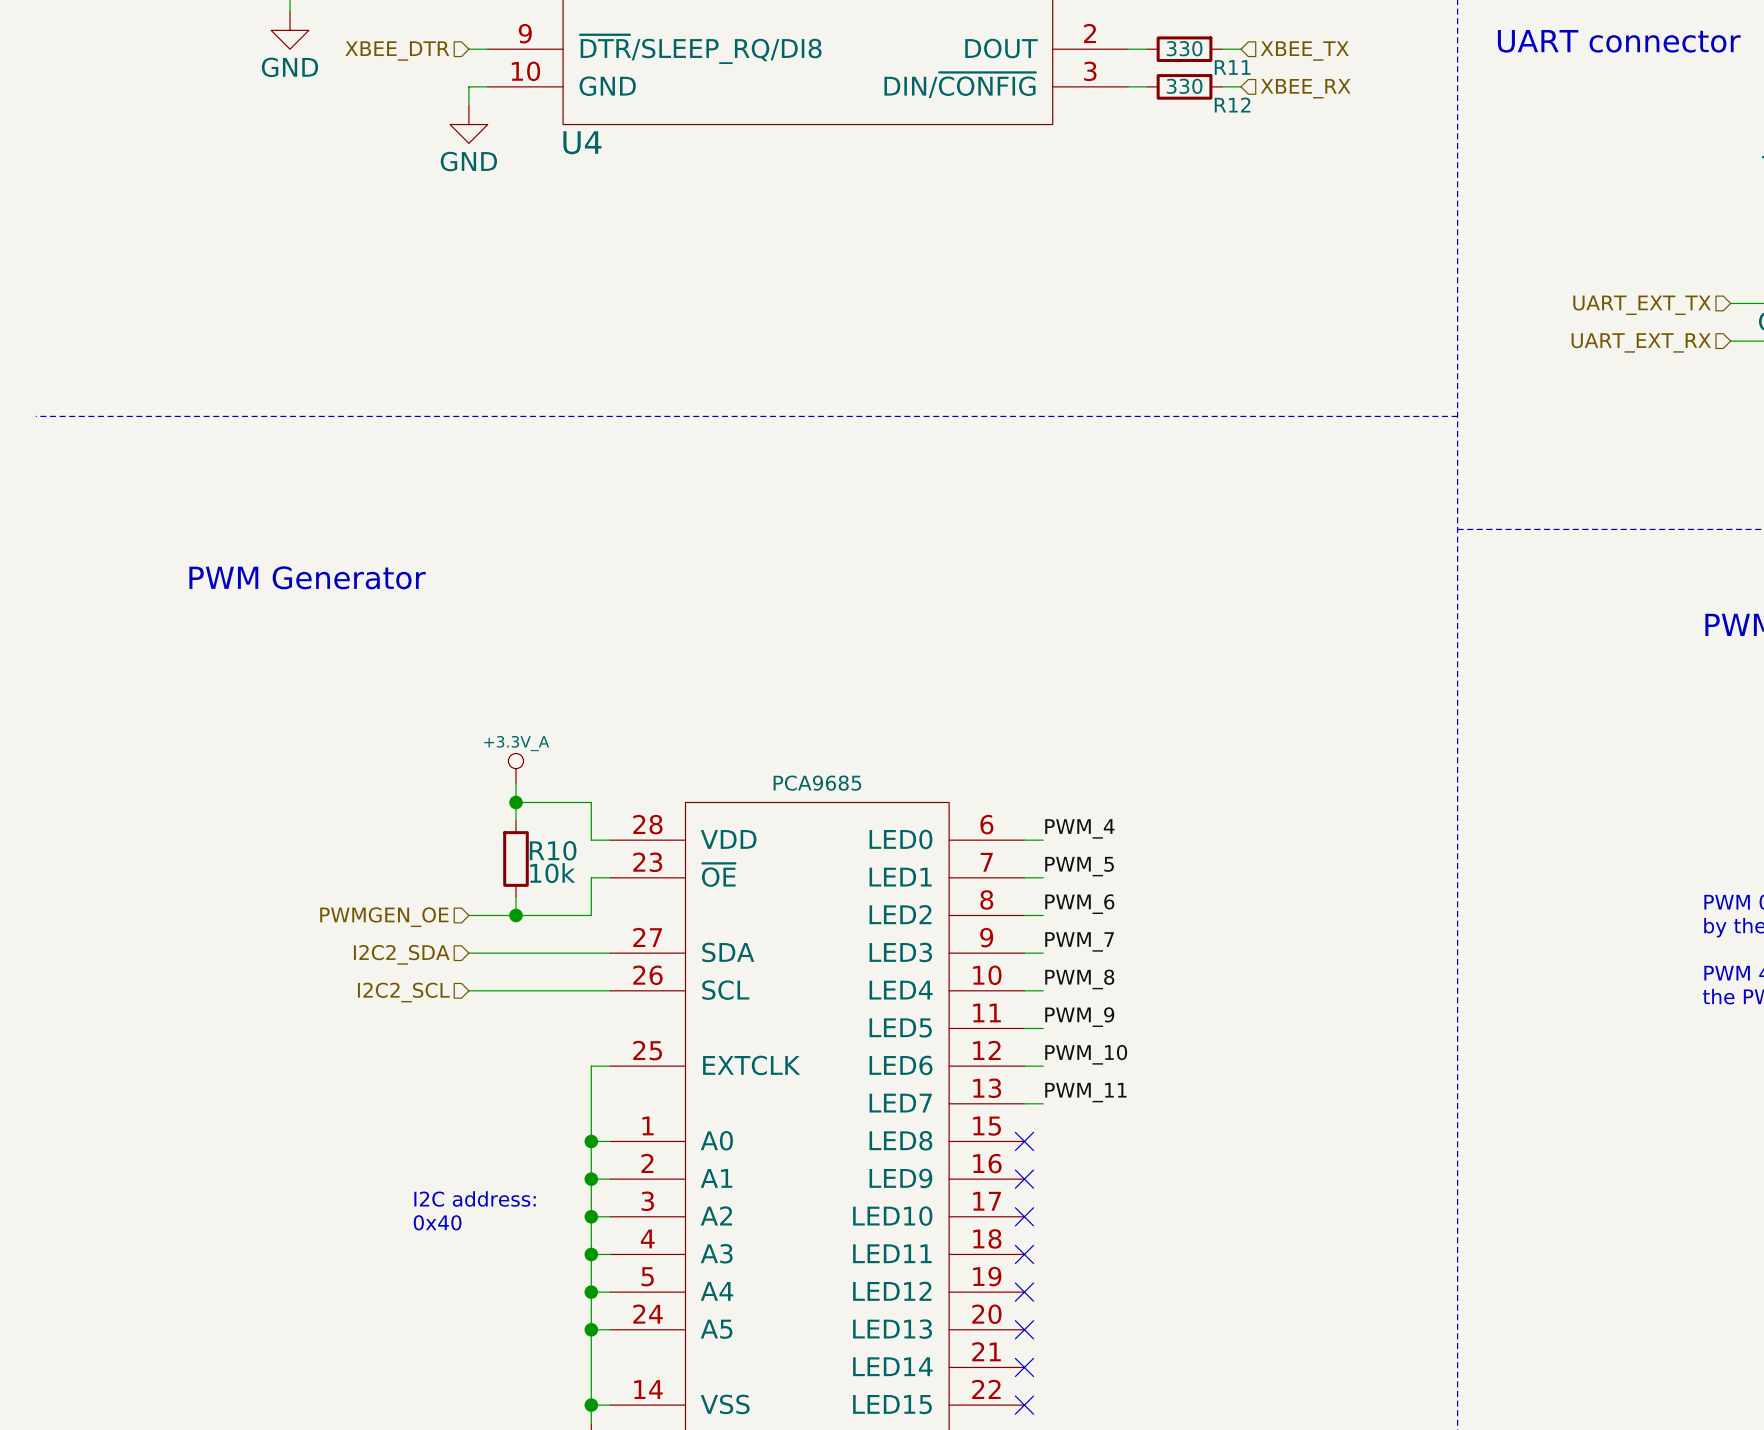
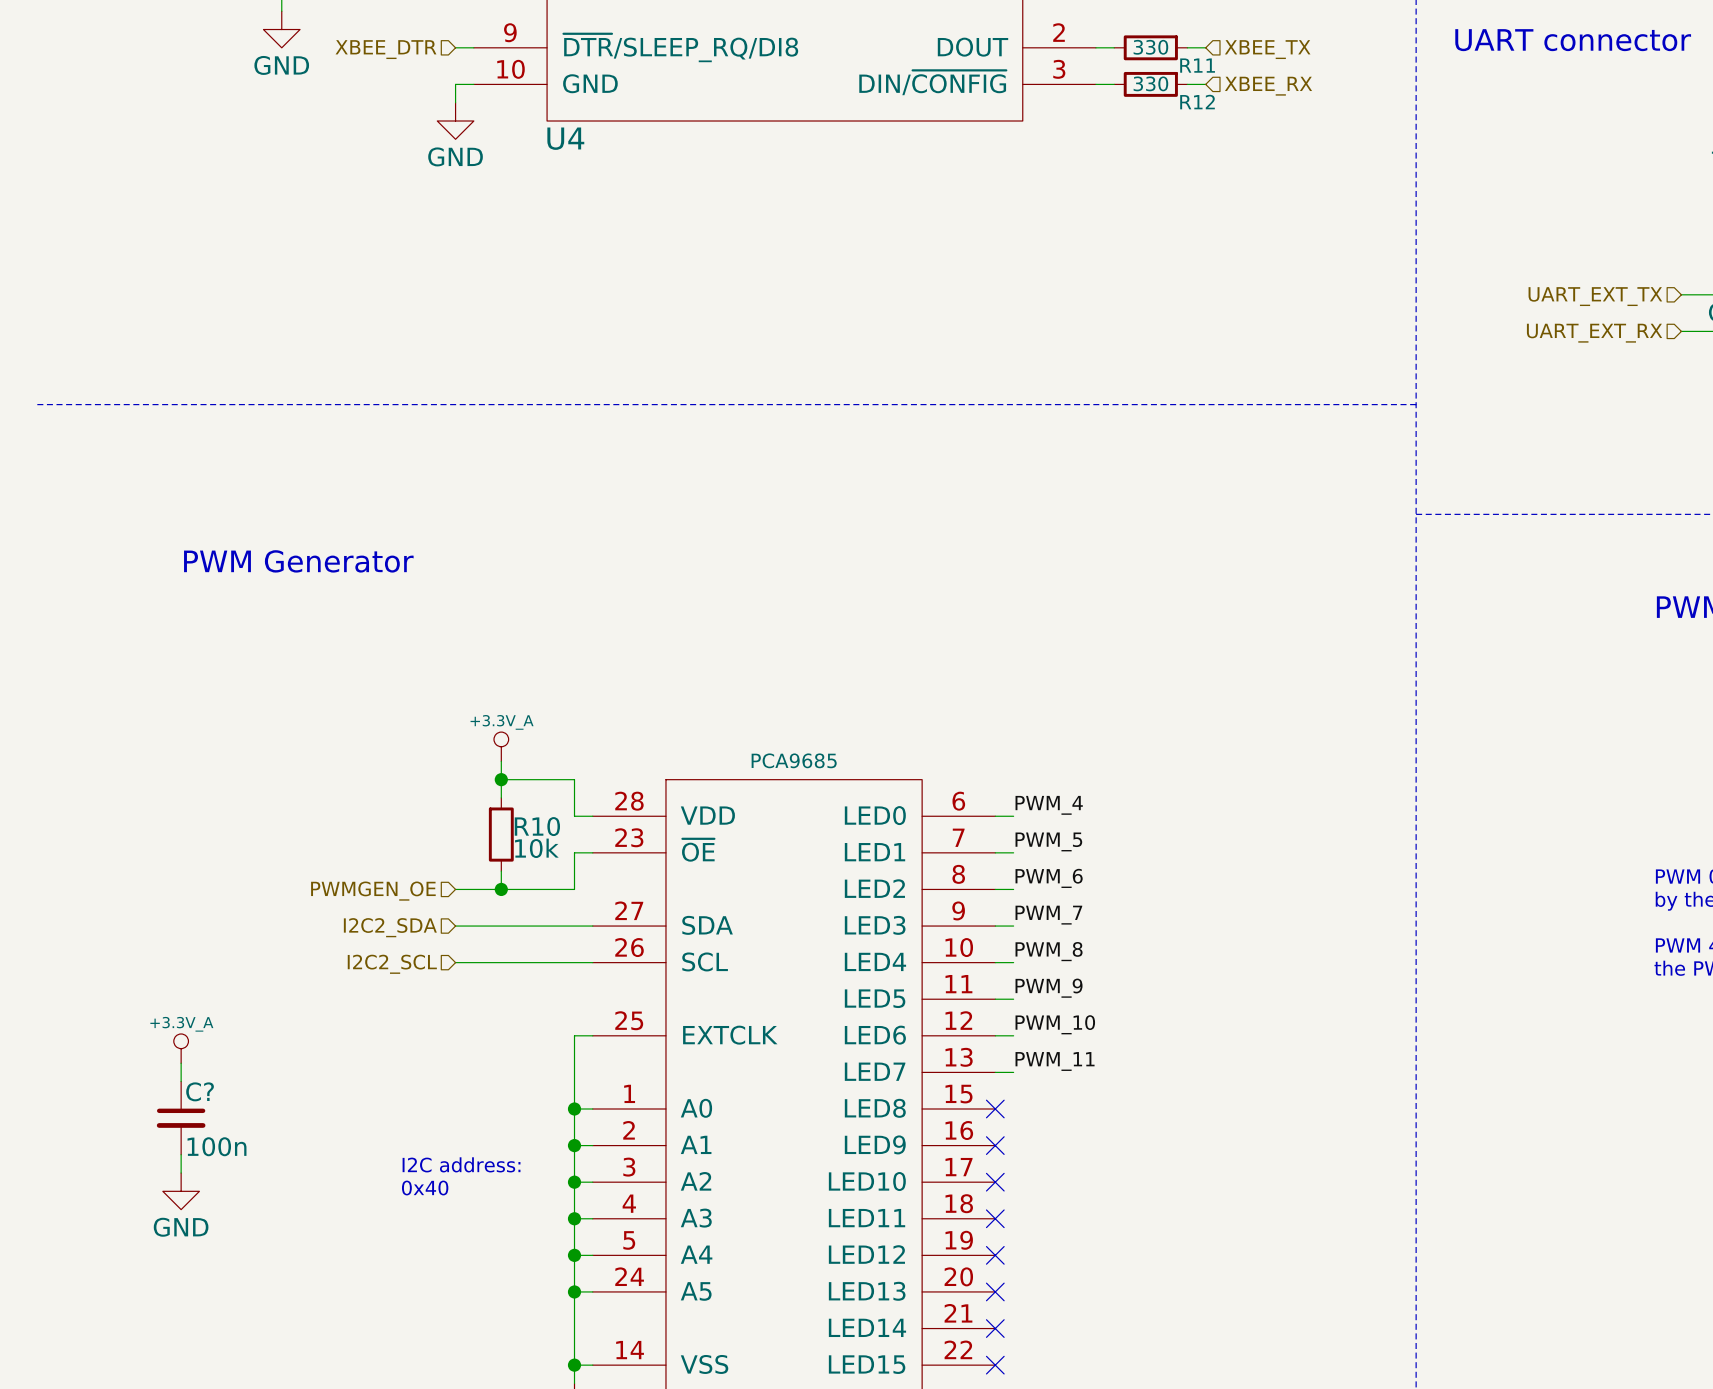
power symbol: none -> +3.3V_A (181, 1048)
wire: none -> (181, 1063) (181, 1081)
C?: none -> 100n (181, 1118)
wire: none -> (181, 1154) (181, 1173)
power symbol: none -> GND (181, 1191)

